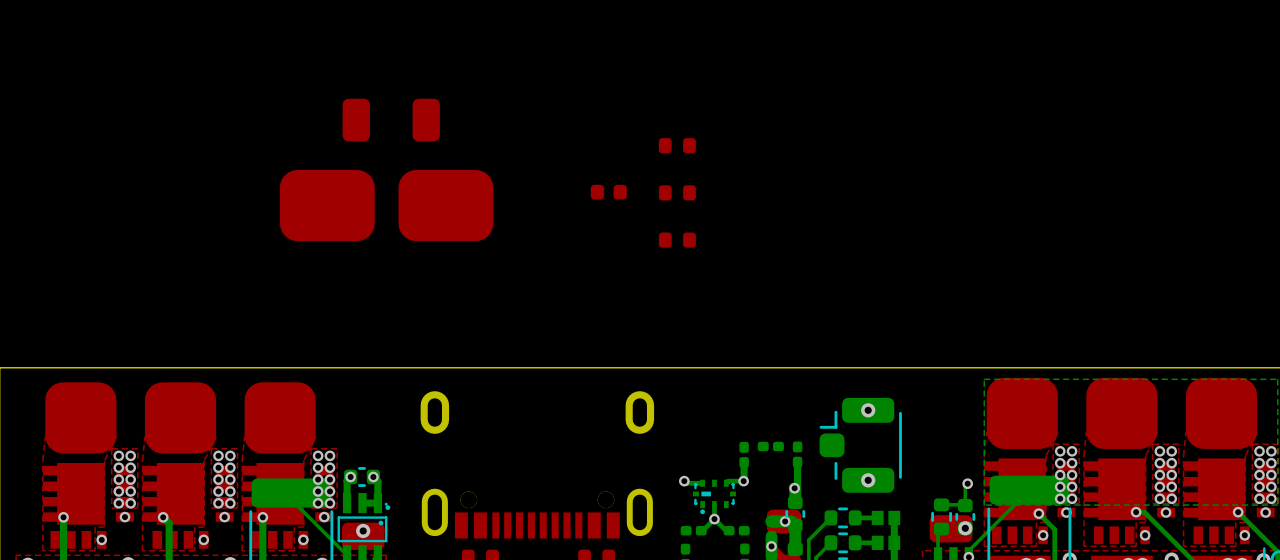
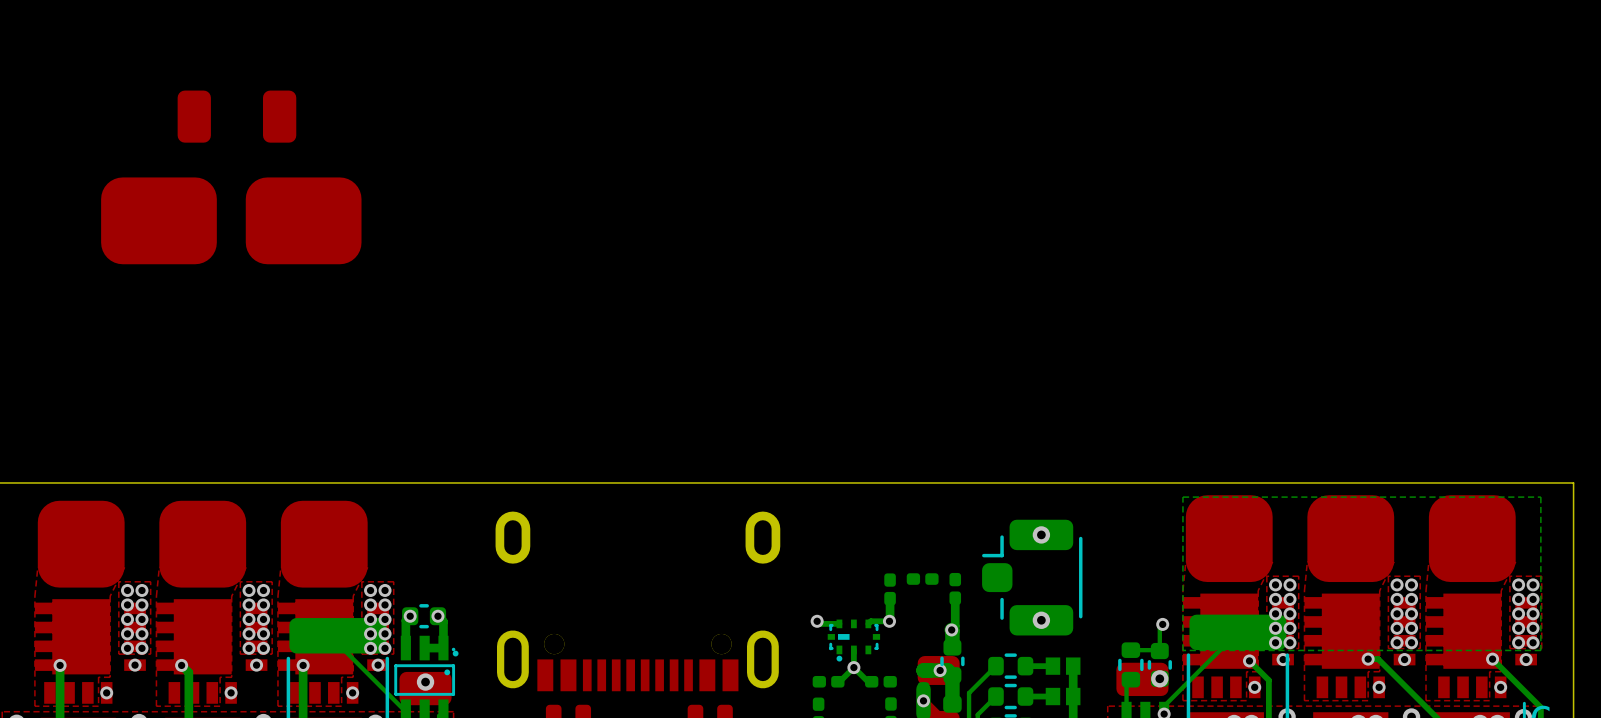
part position: (391, 120) -> (236, 116)
part: (677, 145) -> none
part: none -> (158, 220)
part: (608, 192) -> none
part: (677, 192) -> none
part position: (327, 205) -> (303, 220)
part: (445, 205) -> none
part: (677, 240) -> none

